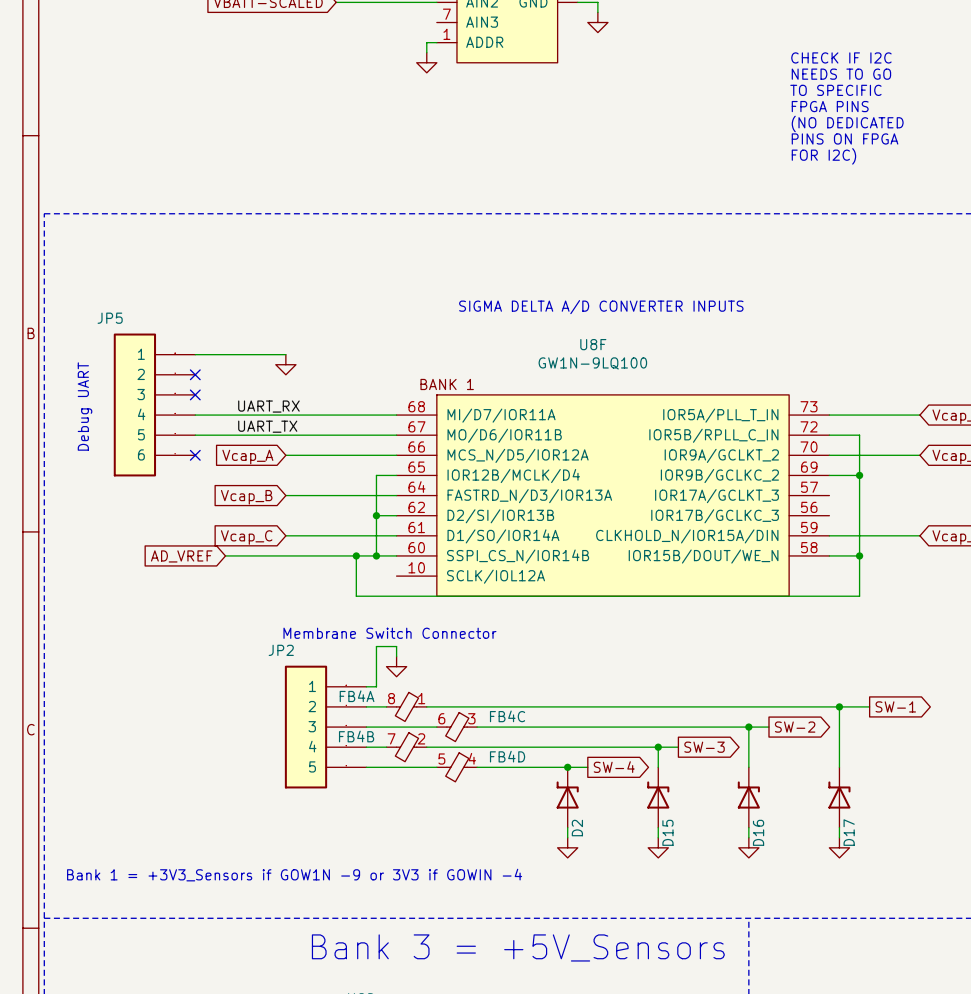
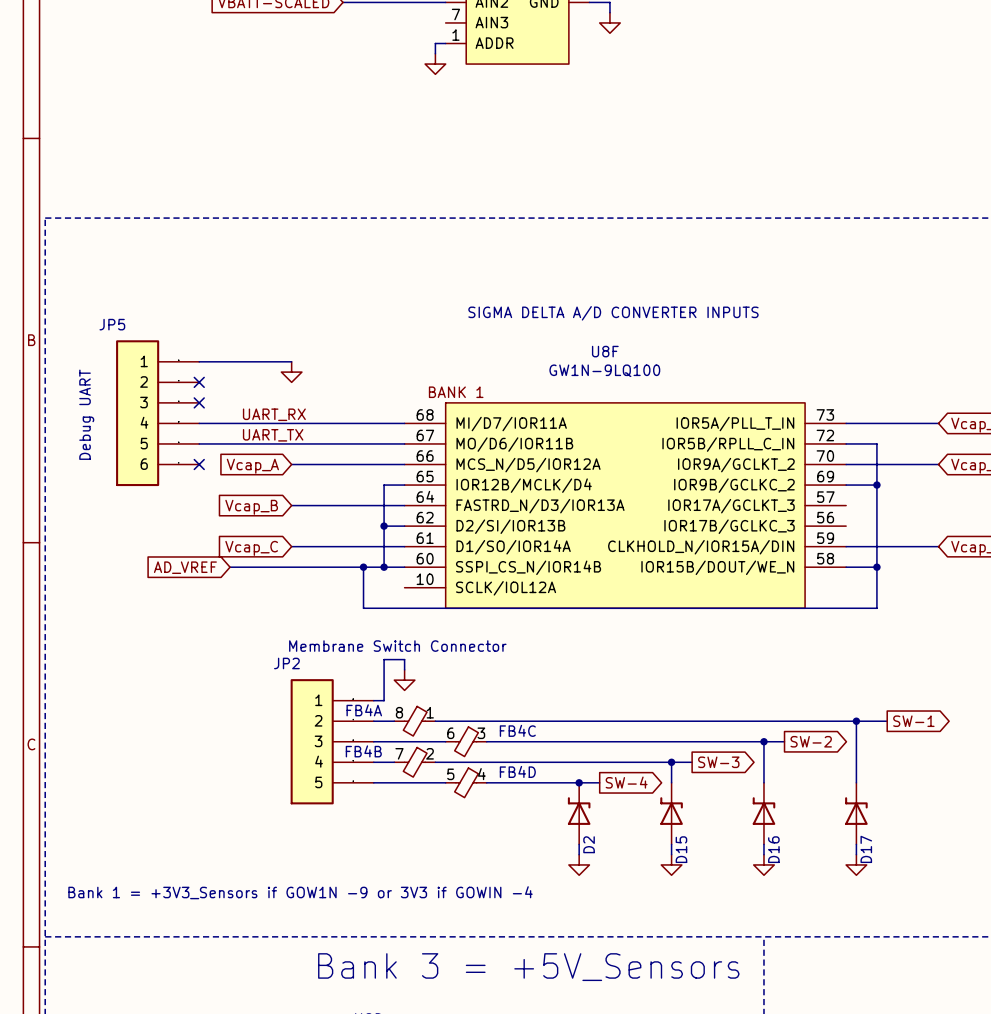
text: CHECK IF I2C (841, 57) -> none
text: NEEDS TO GO (841, 74) -> none
text: TO SPECIFIC (835, 90) -> none
text: FPGA PINS (830, 106) -> none
text: (NO DEDICATED (847, 123) -> none
text: PINS ON FPGA (845, 138) -> none
text: FOR I2C) (823, 156) -> none

